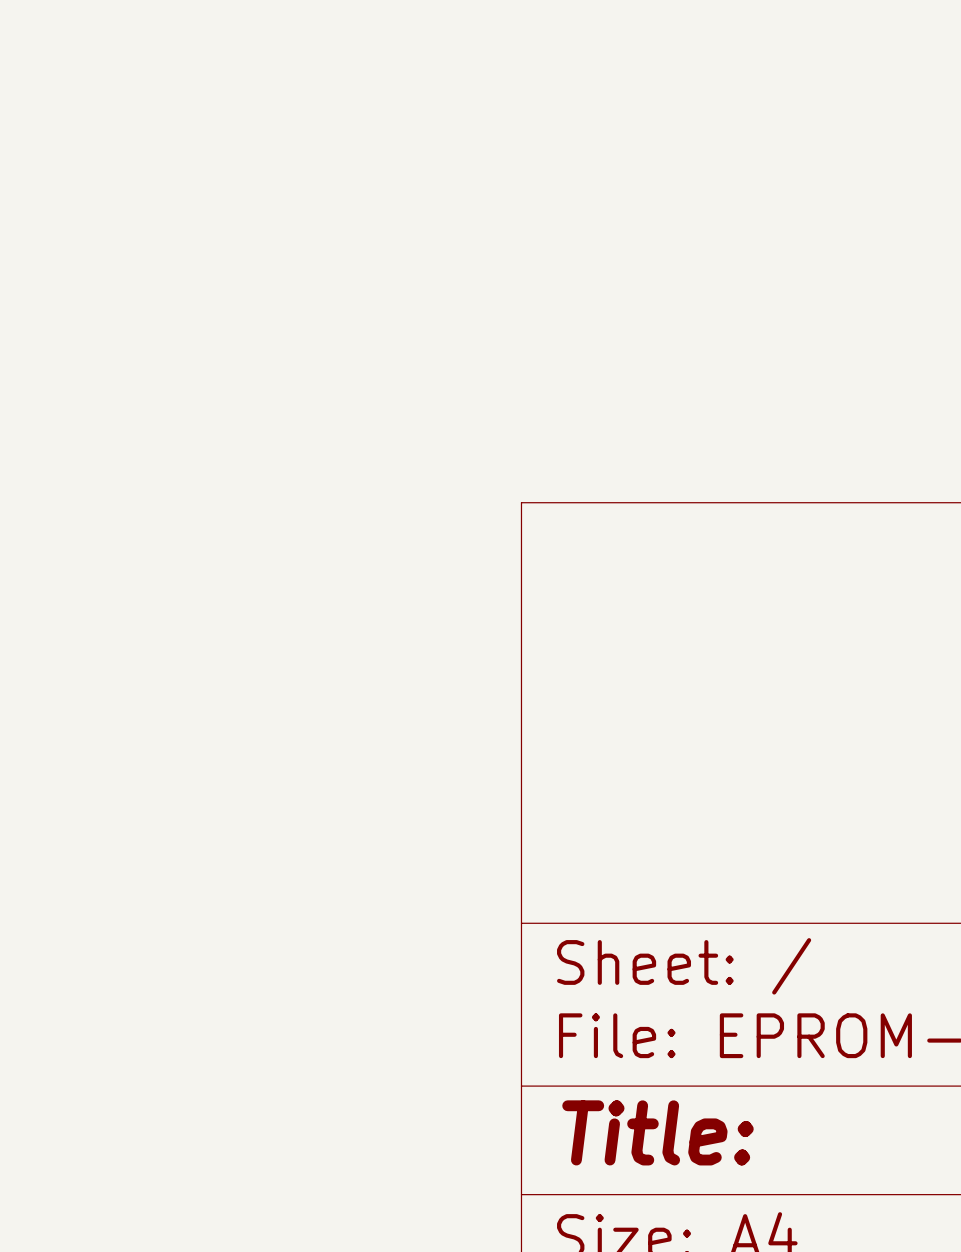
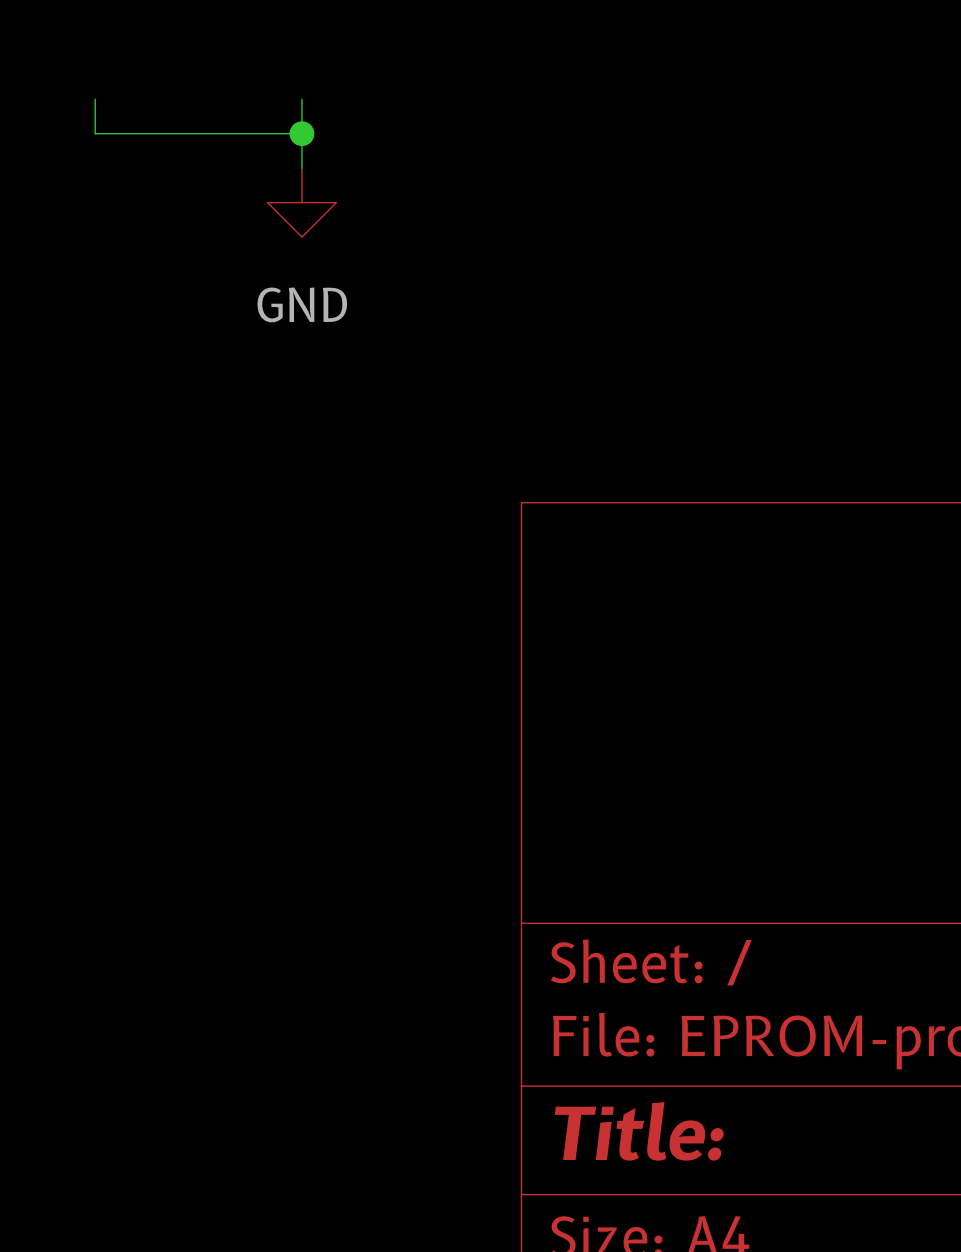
wire: none -> (95, 99) (95, 133) (301, 133)
wire: none -> (301, 99) (301, 168)
junction: none -> (301, 133)
power symbol: none -> GND (301, 202)

